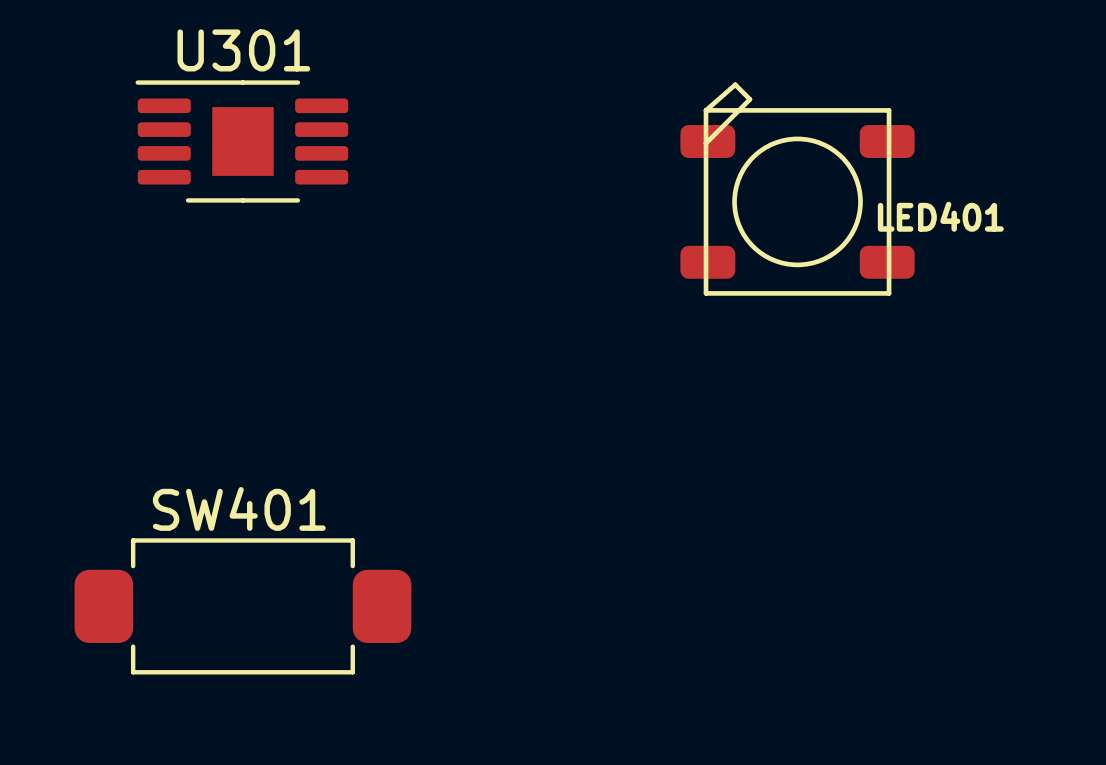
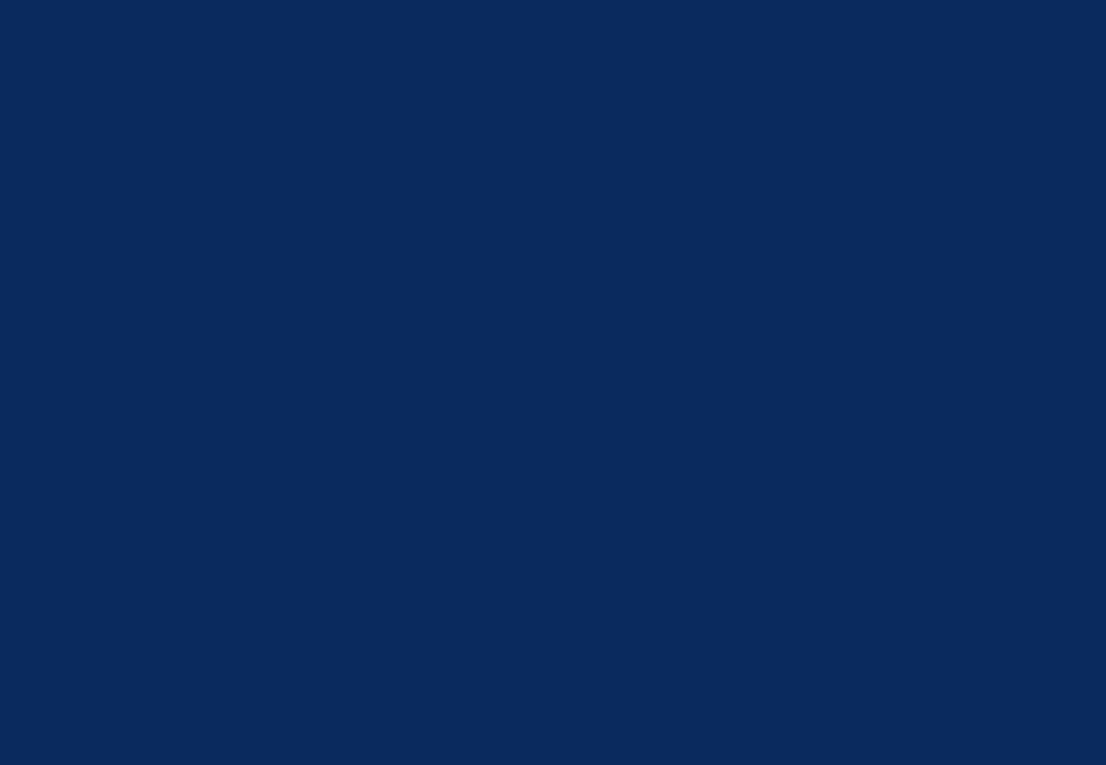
U301: (241, 141) -> none
LED401: (797, 189) -> none
SW401: (242, 606) -> none

